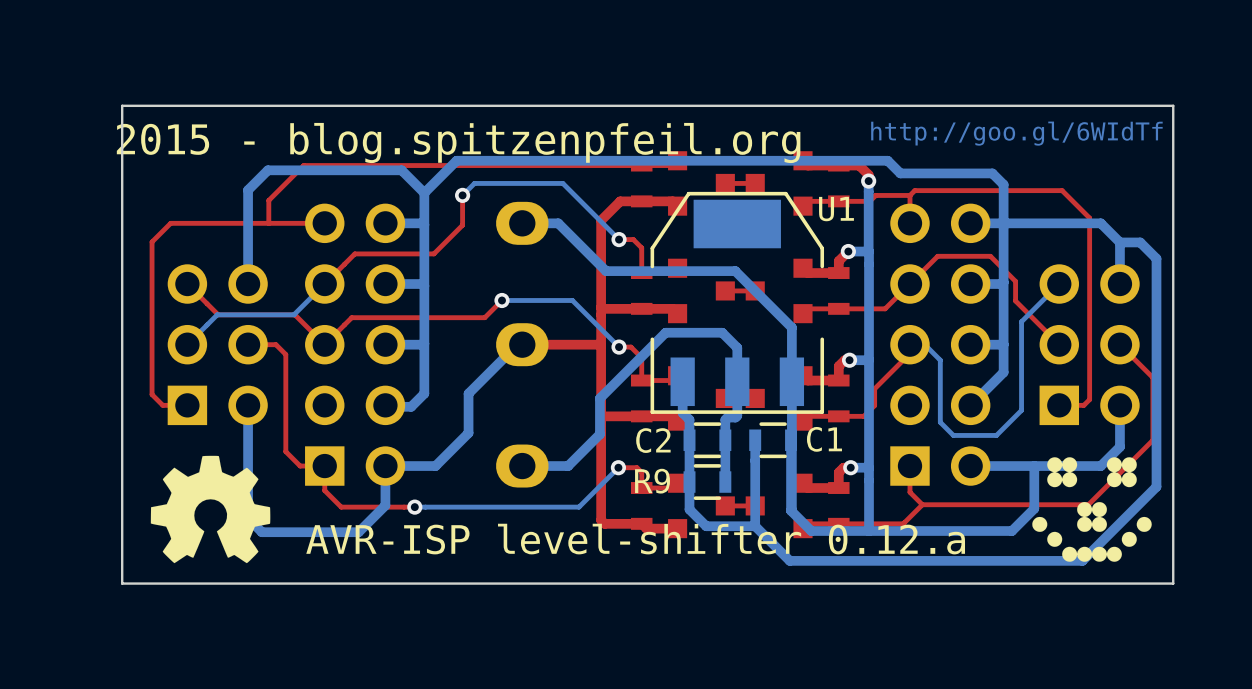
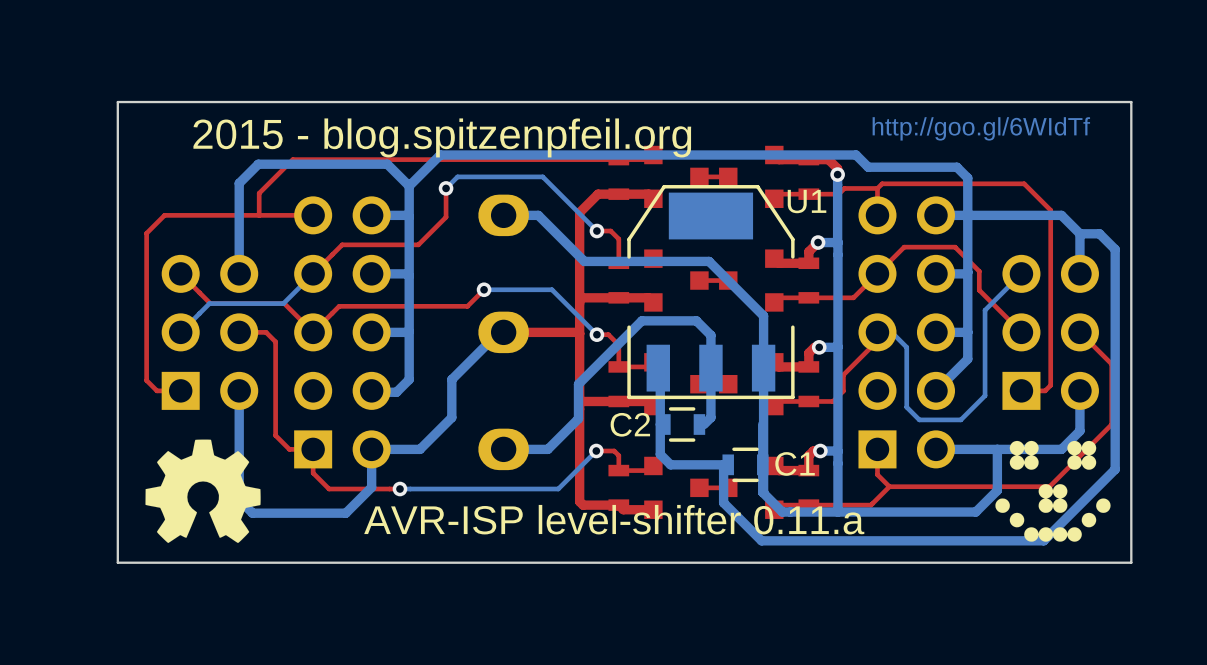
bottom track: (682, 381) (682, 412) (689, 419) (689, 509) (706, 526) (755, 526) (755, 440) -> (658, 368) (660, 370) (660, 454) (670, 464) (723, 464) (723, 502) (728, 507)
bottom track: (737, 415) (725, 419) (725, 482) -> (710, 400) (710, 417) (704, 424)
C1 position: (773, 440) -> (745, 464)
R9: (707, 482) -> none
text: AVR-ISP level-shifter 0.12.a (635, 539) -> AVR-ISP level-shifter 0.11.a (614, 519)

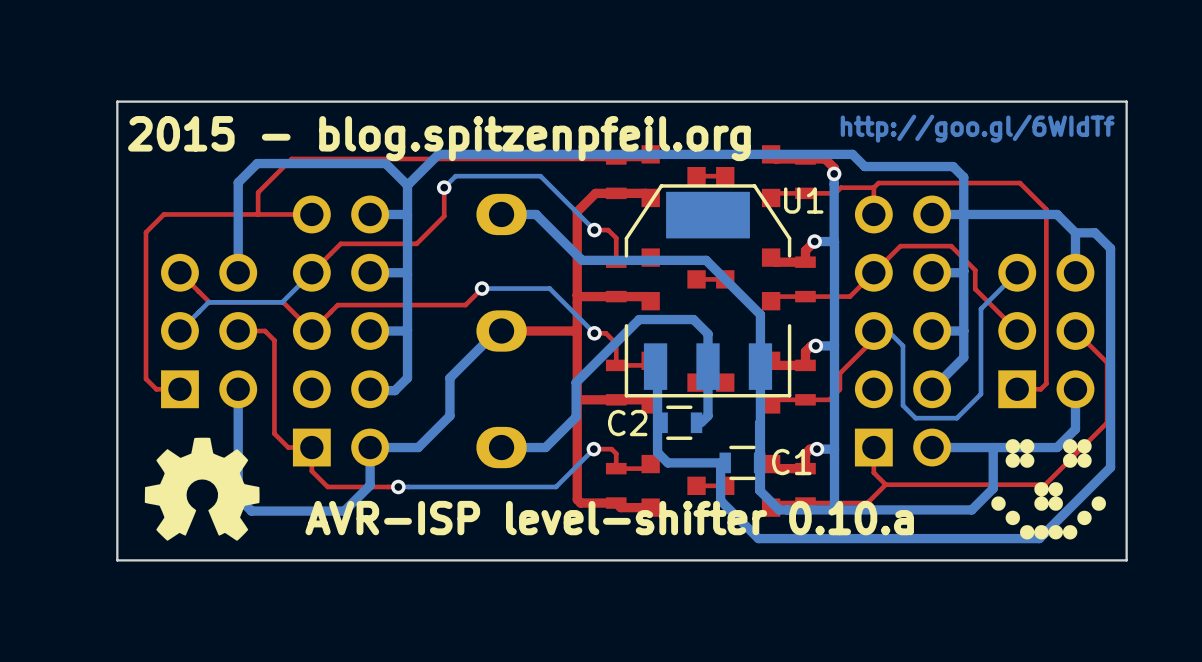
text: AVR-ISP level-shifter 0.11.a (614, 519) -> AVR-ISP level-shifter 0.10.a (609, 518)

